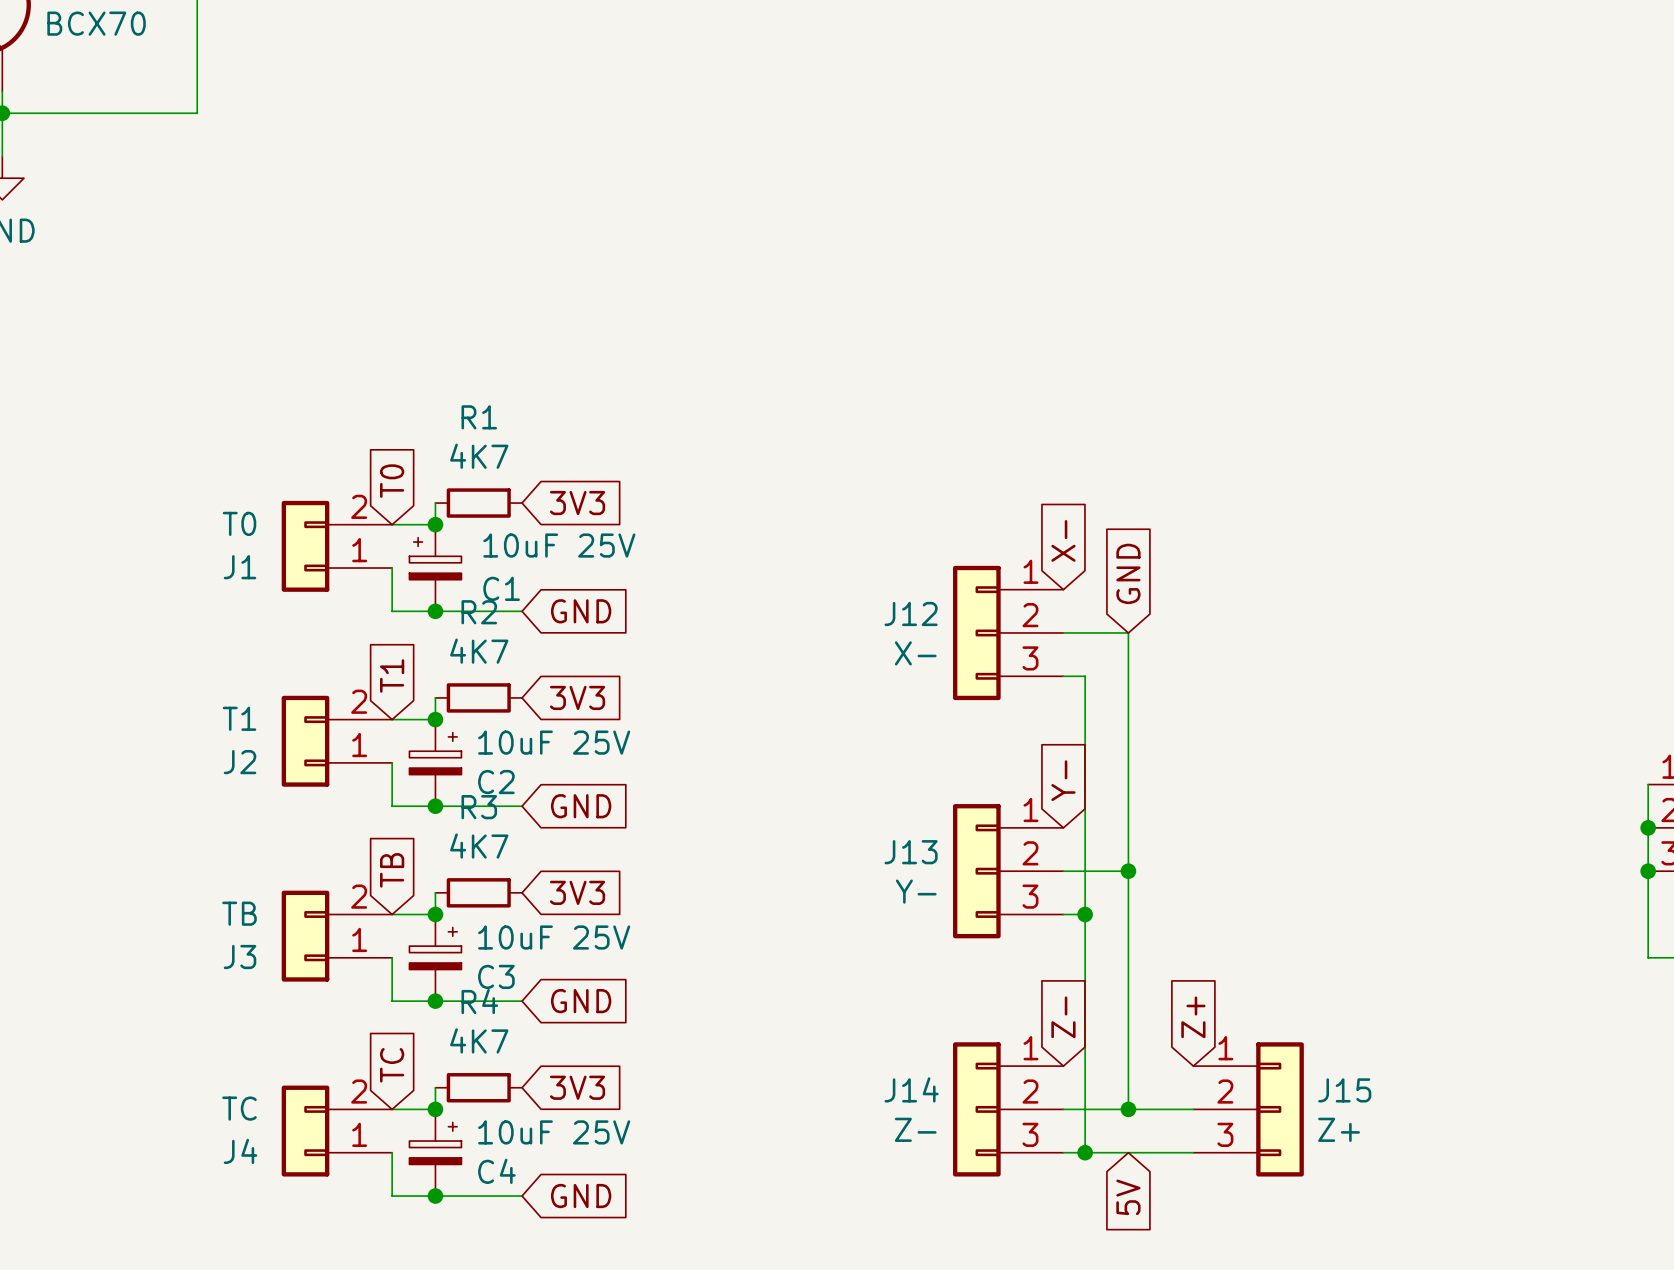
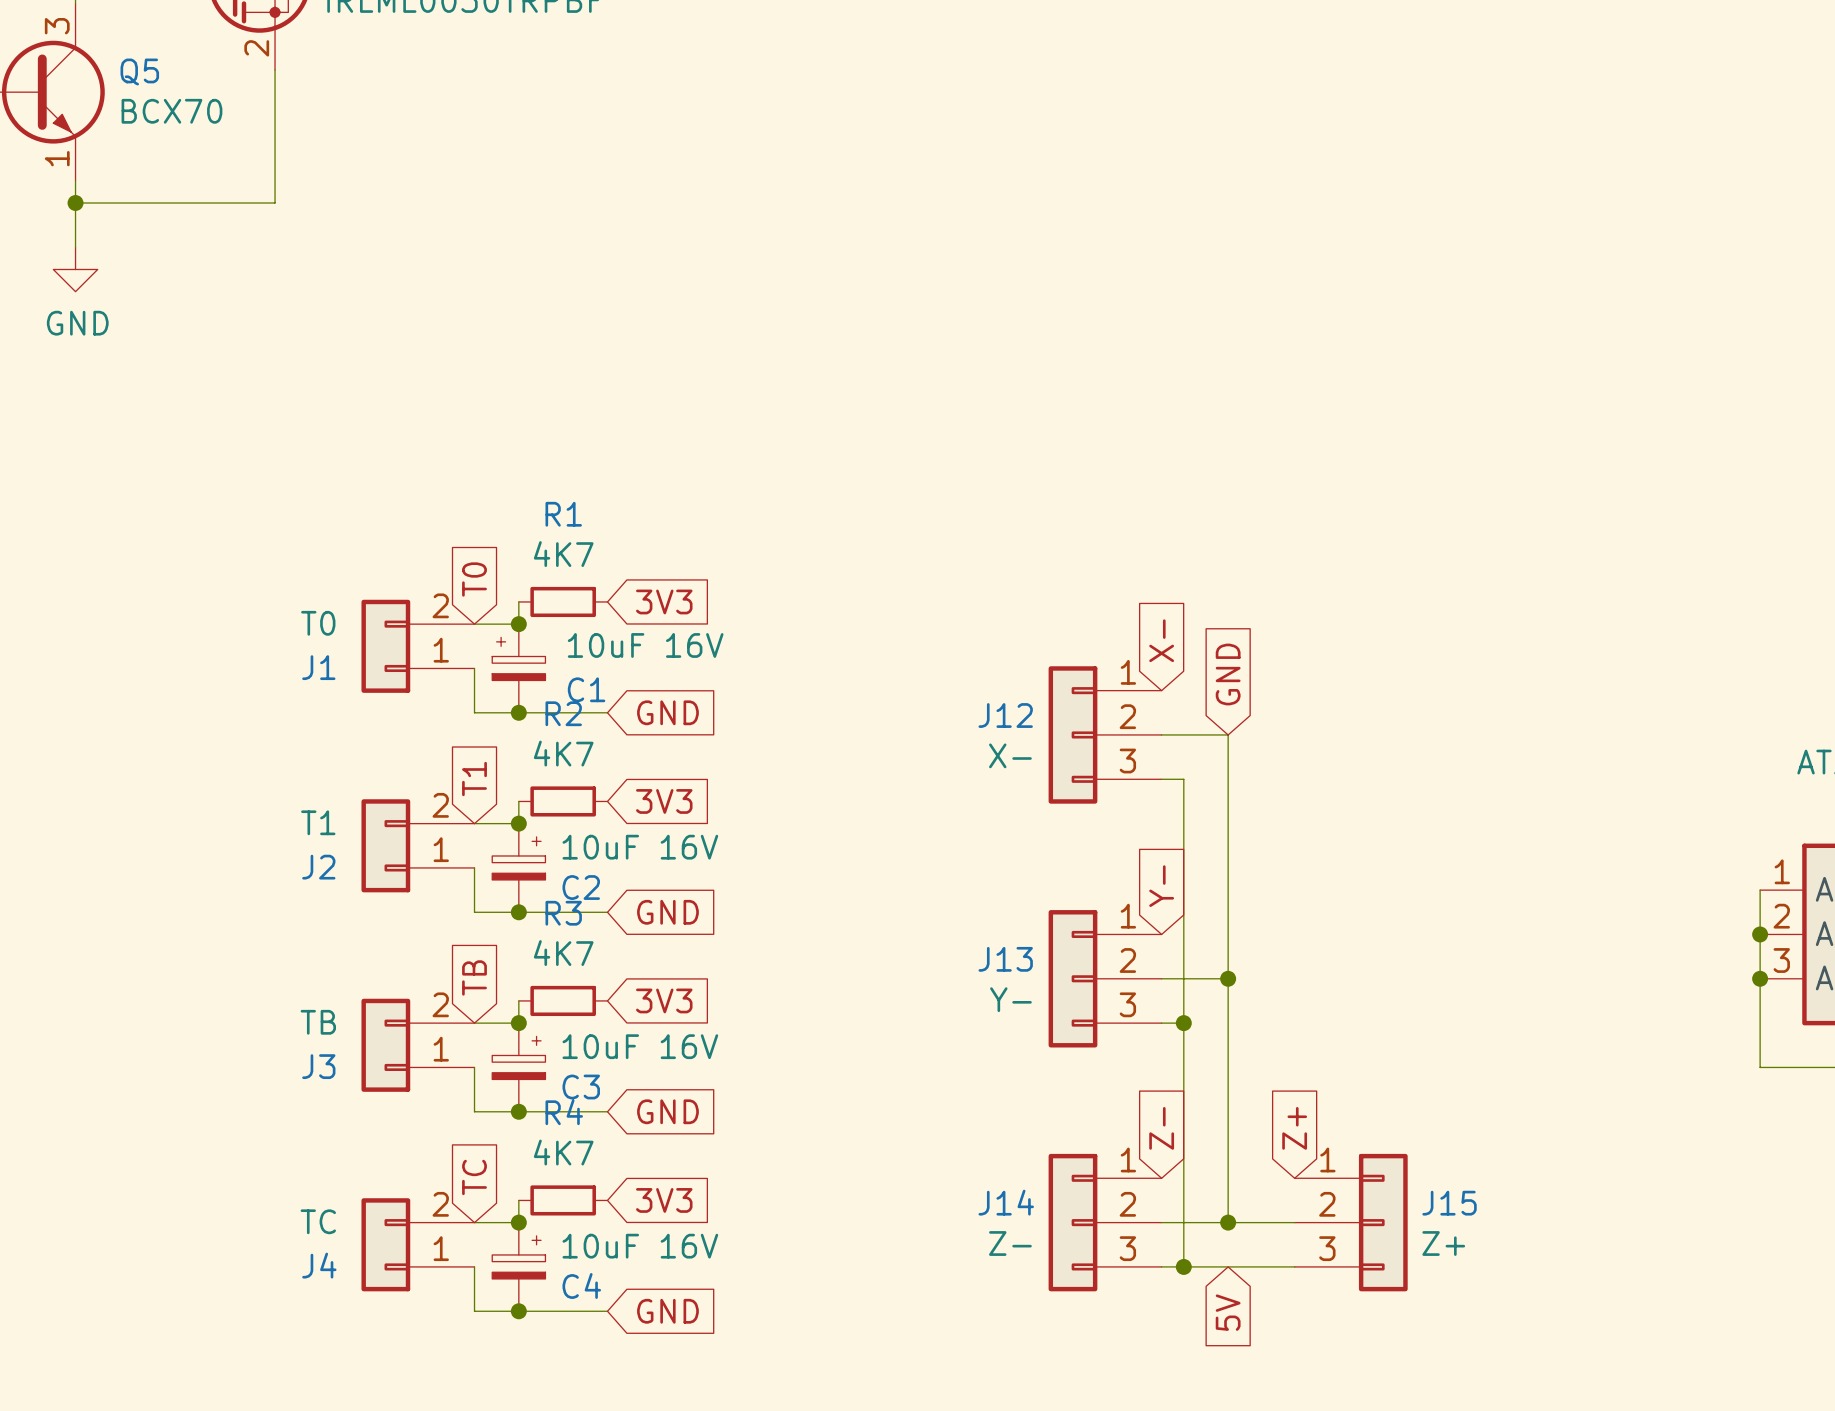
C1 value: 10uF 25V (559, 545) -> 10uF 16V (645, 645)
C2 value: 10uF 25V (554, 742) -> 10uF 16V (640, 847)
C3 value: 10uF 25V (554, 937) -> 10uF 16V (640, 1046)
C4 value: 10uF 25V (554, 1132) -> 10uF 16V (640, 1246)

